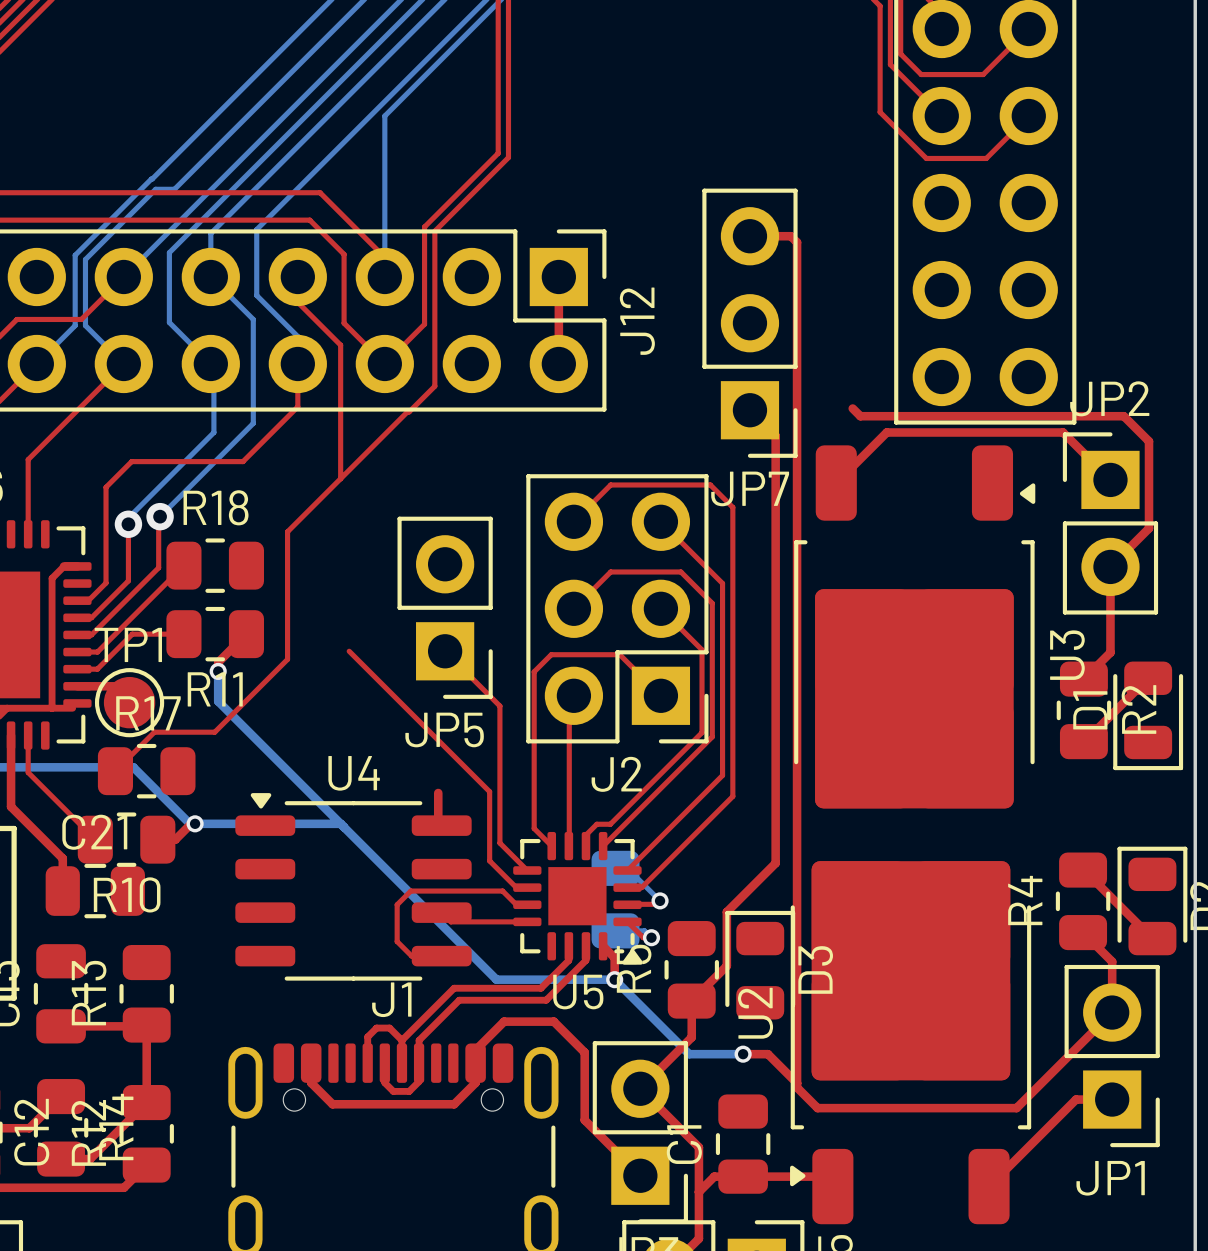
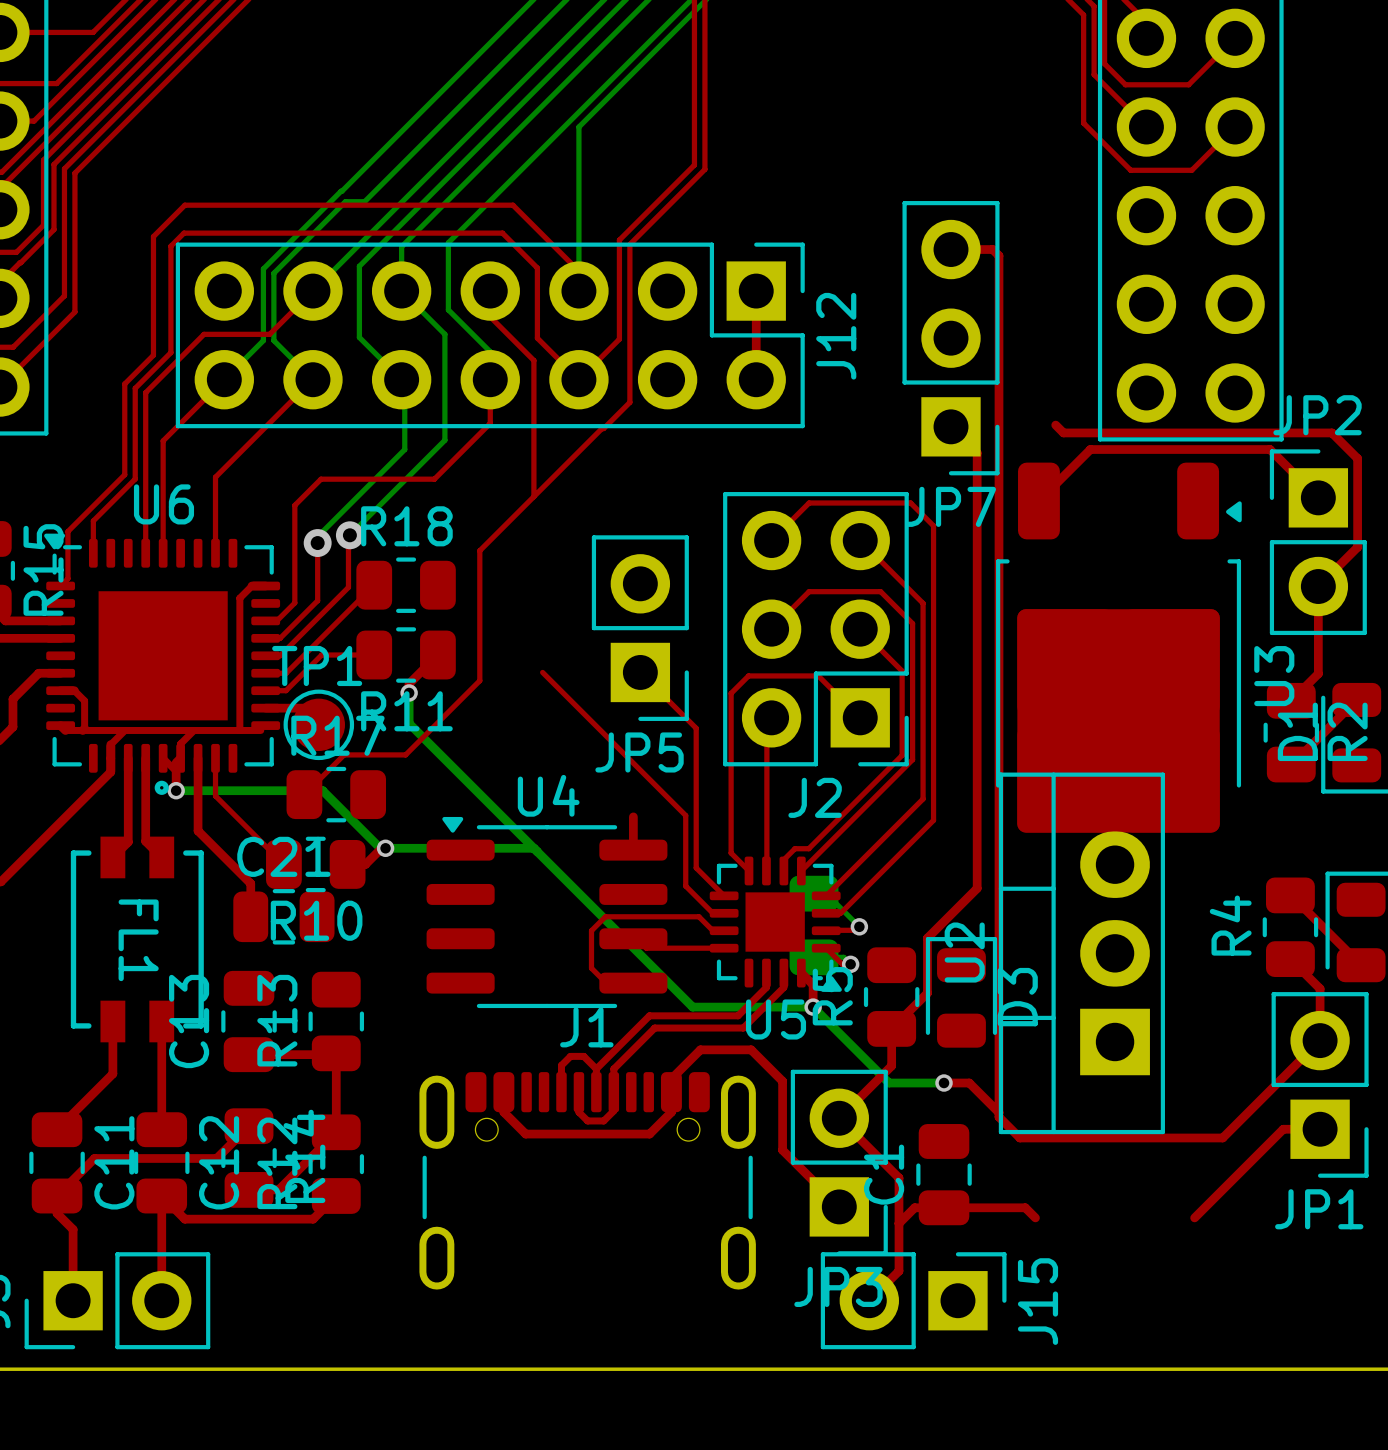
U4 footprint: [235, 793, 472, 981] -> [426, 816, 668, 1009]
U2 footprint: [790, 861, 1032, 1225] -> [998, 772, 1165, 1135]

